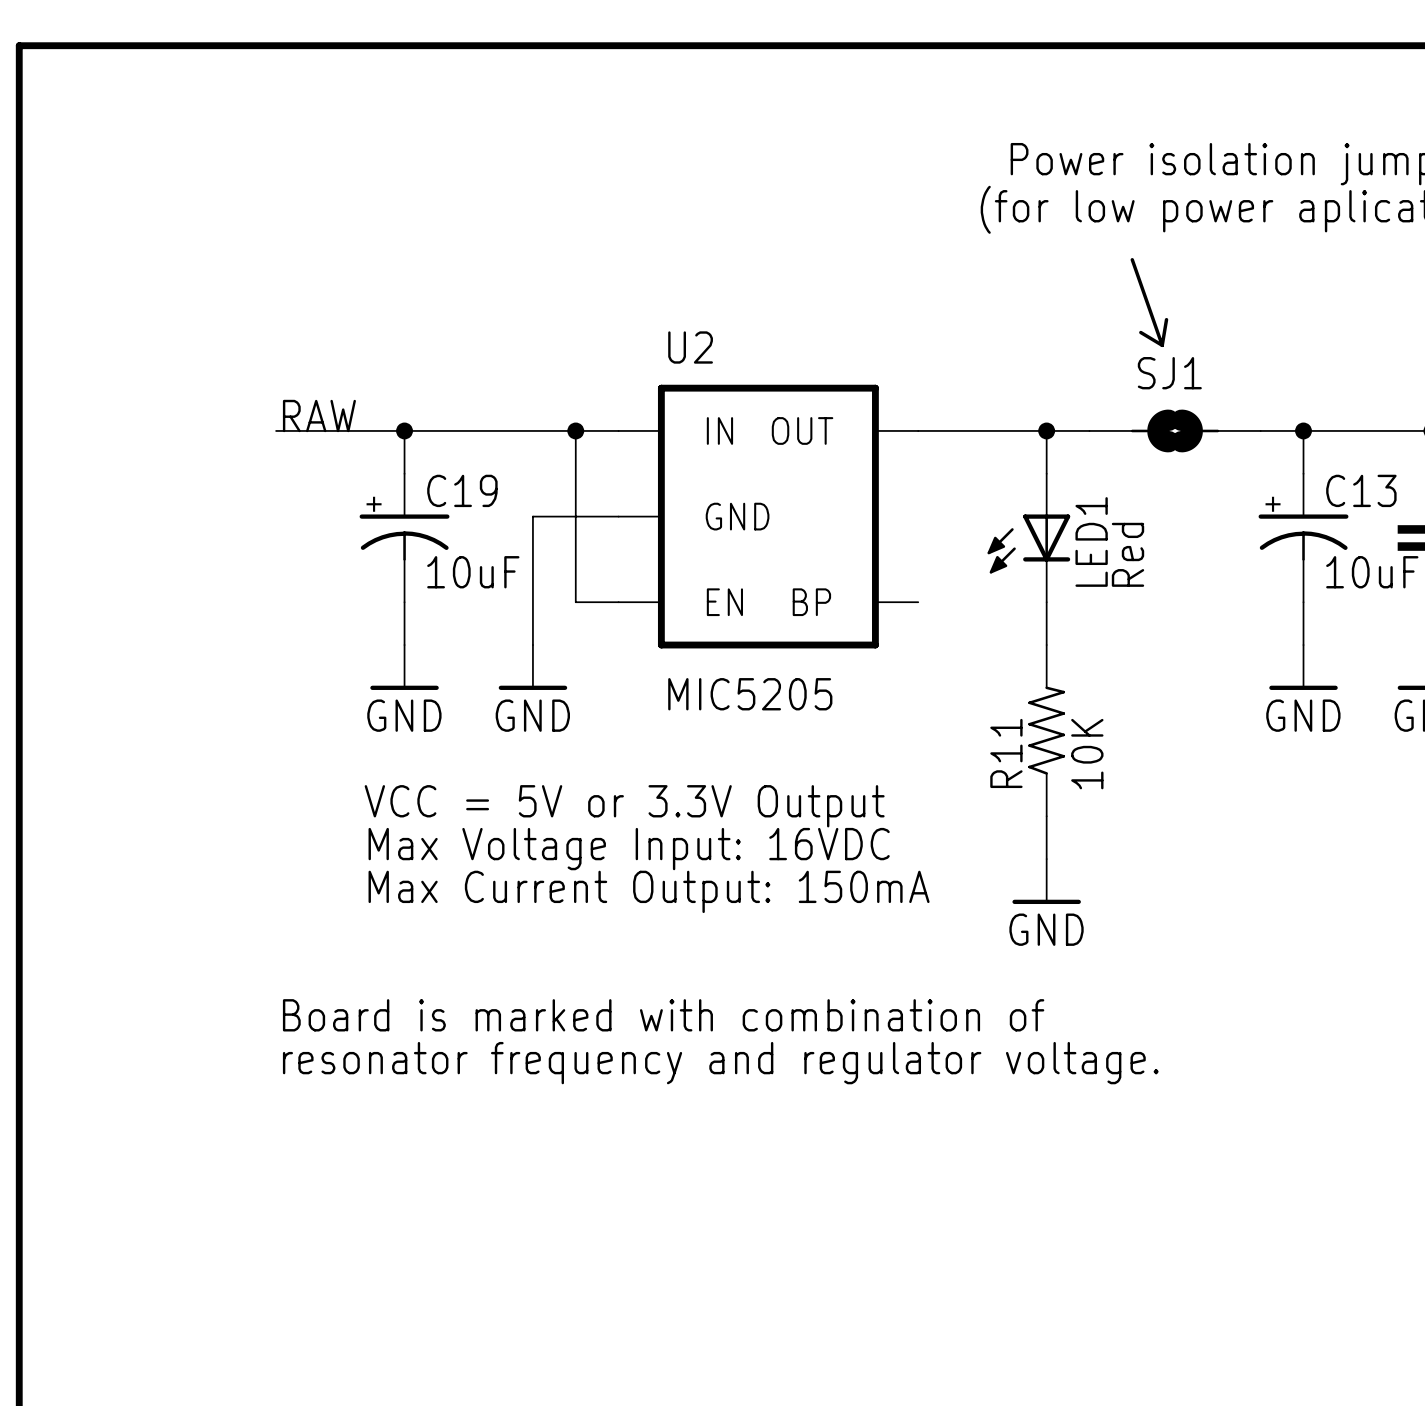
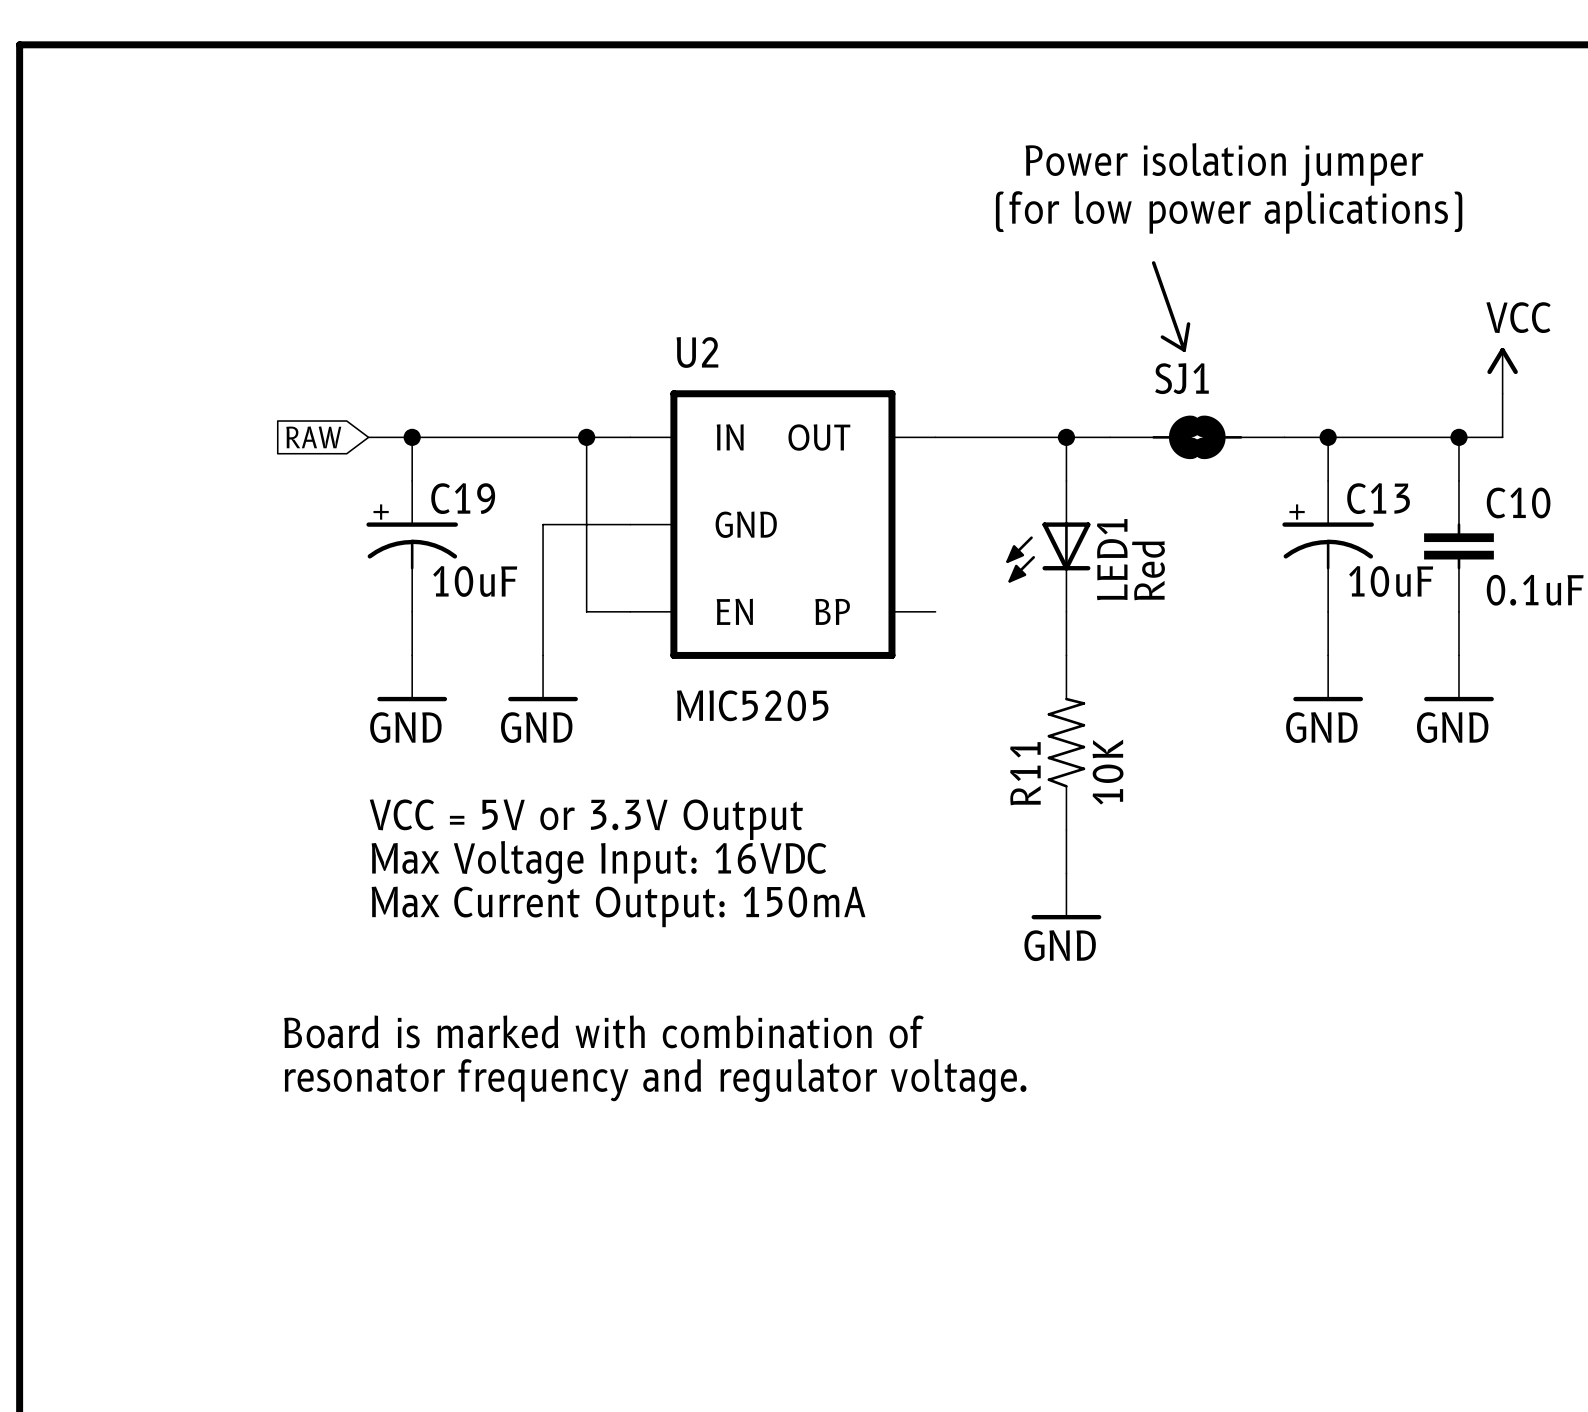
label: RAW (319, 415) -> none
wire: (276, 430) (361, 430) -> none
global label: none -> RAW (313, 437)

